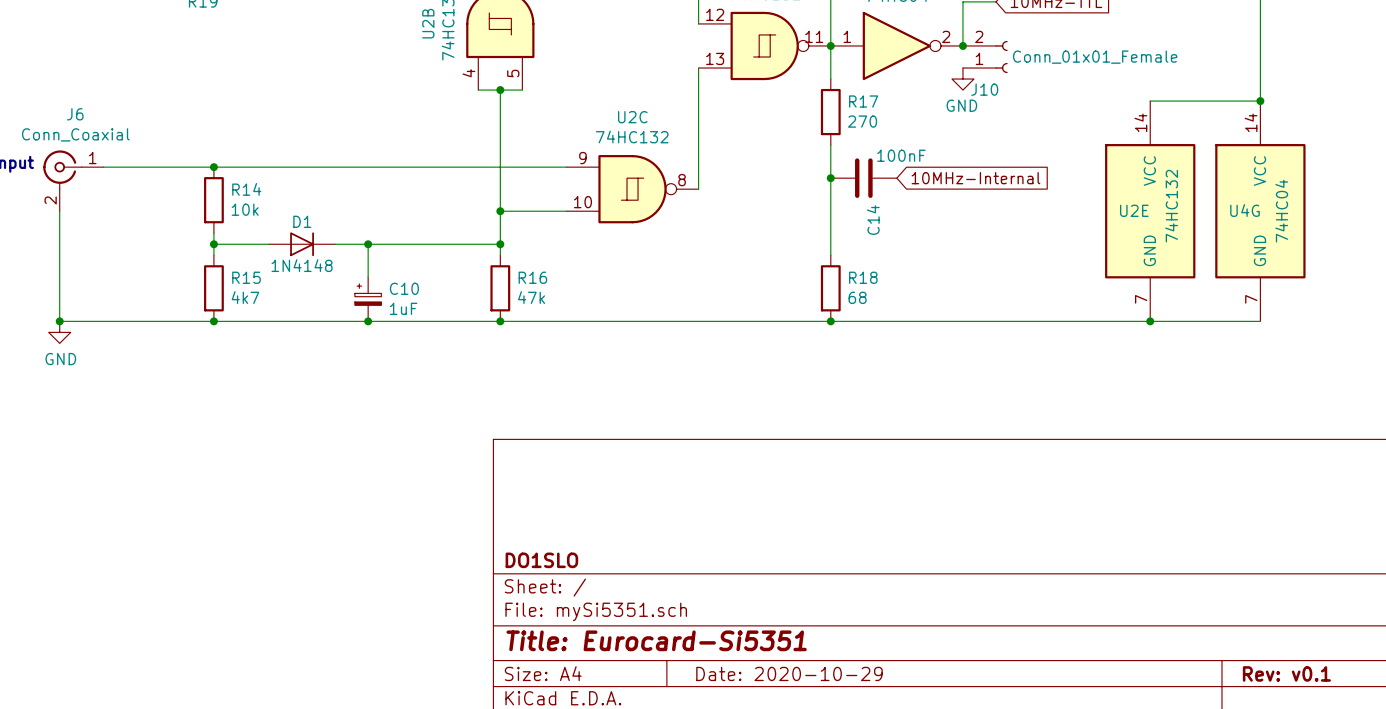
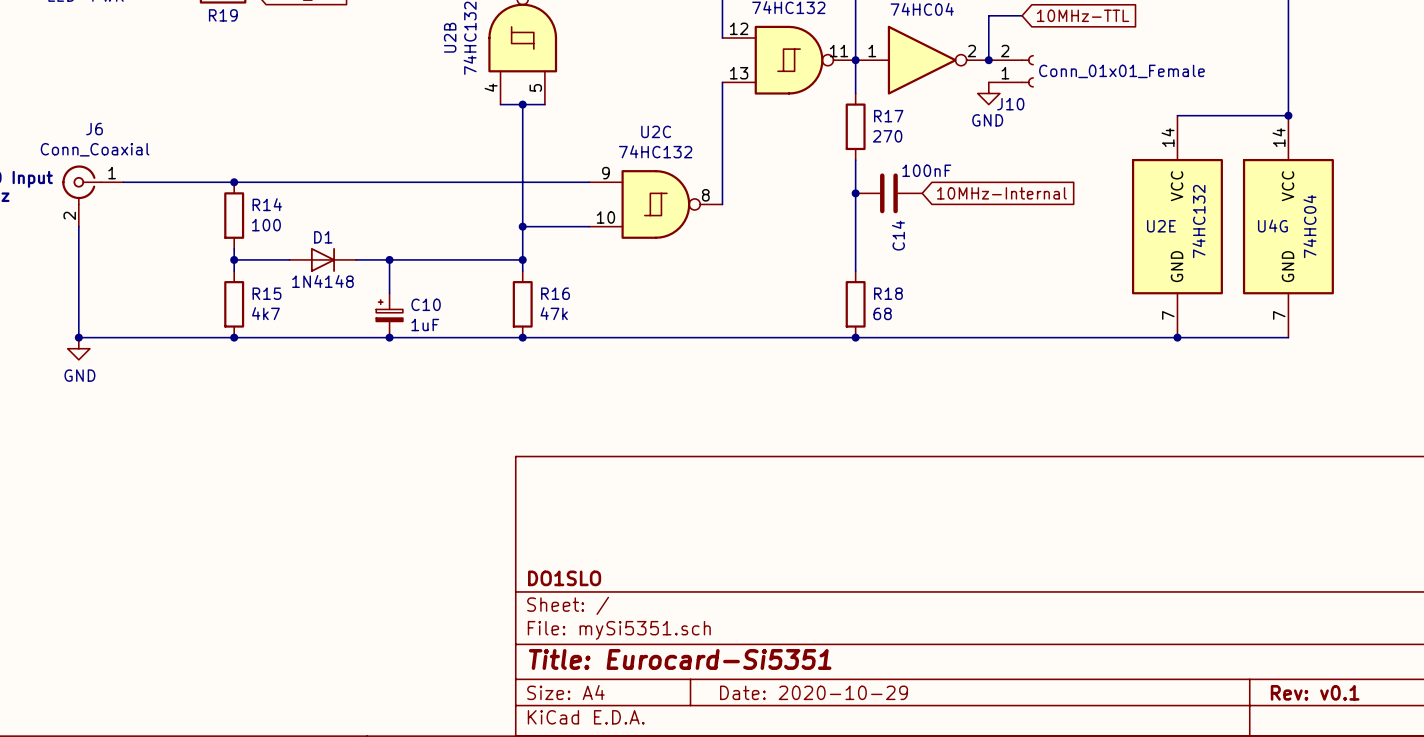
R14 value: 10k (245, 209) -> 100 (266, 225)

